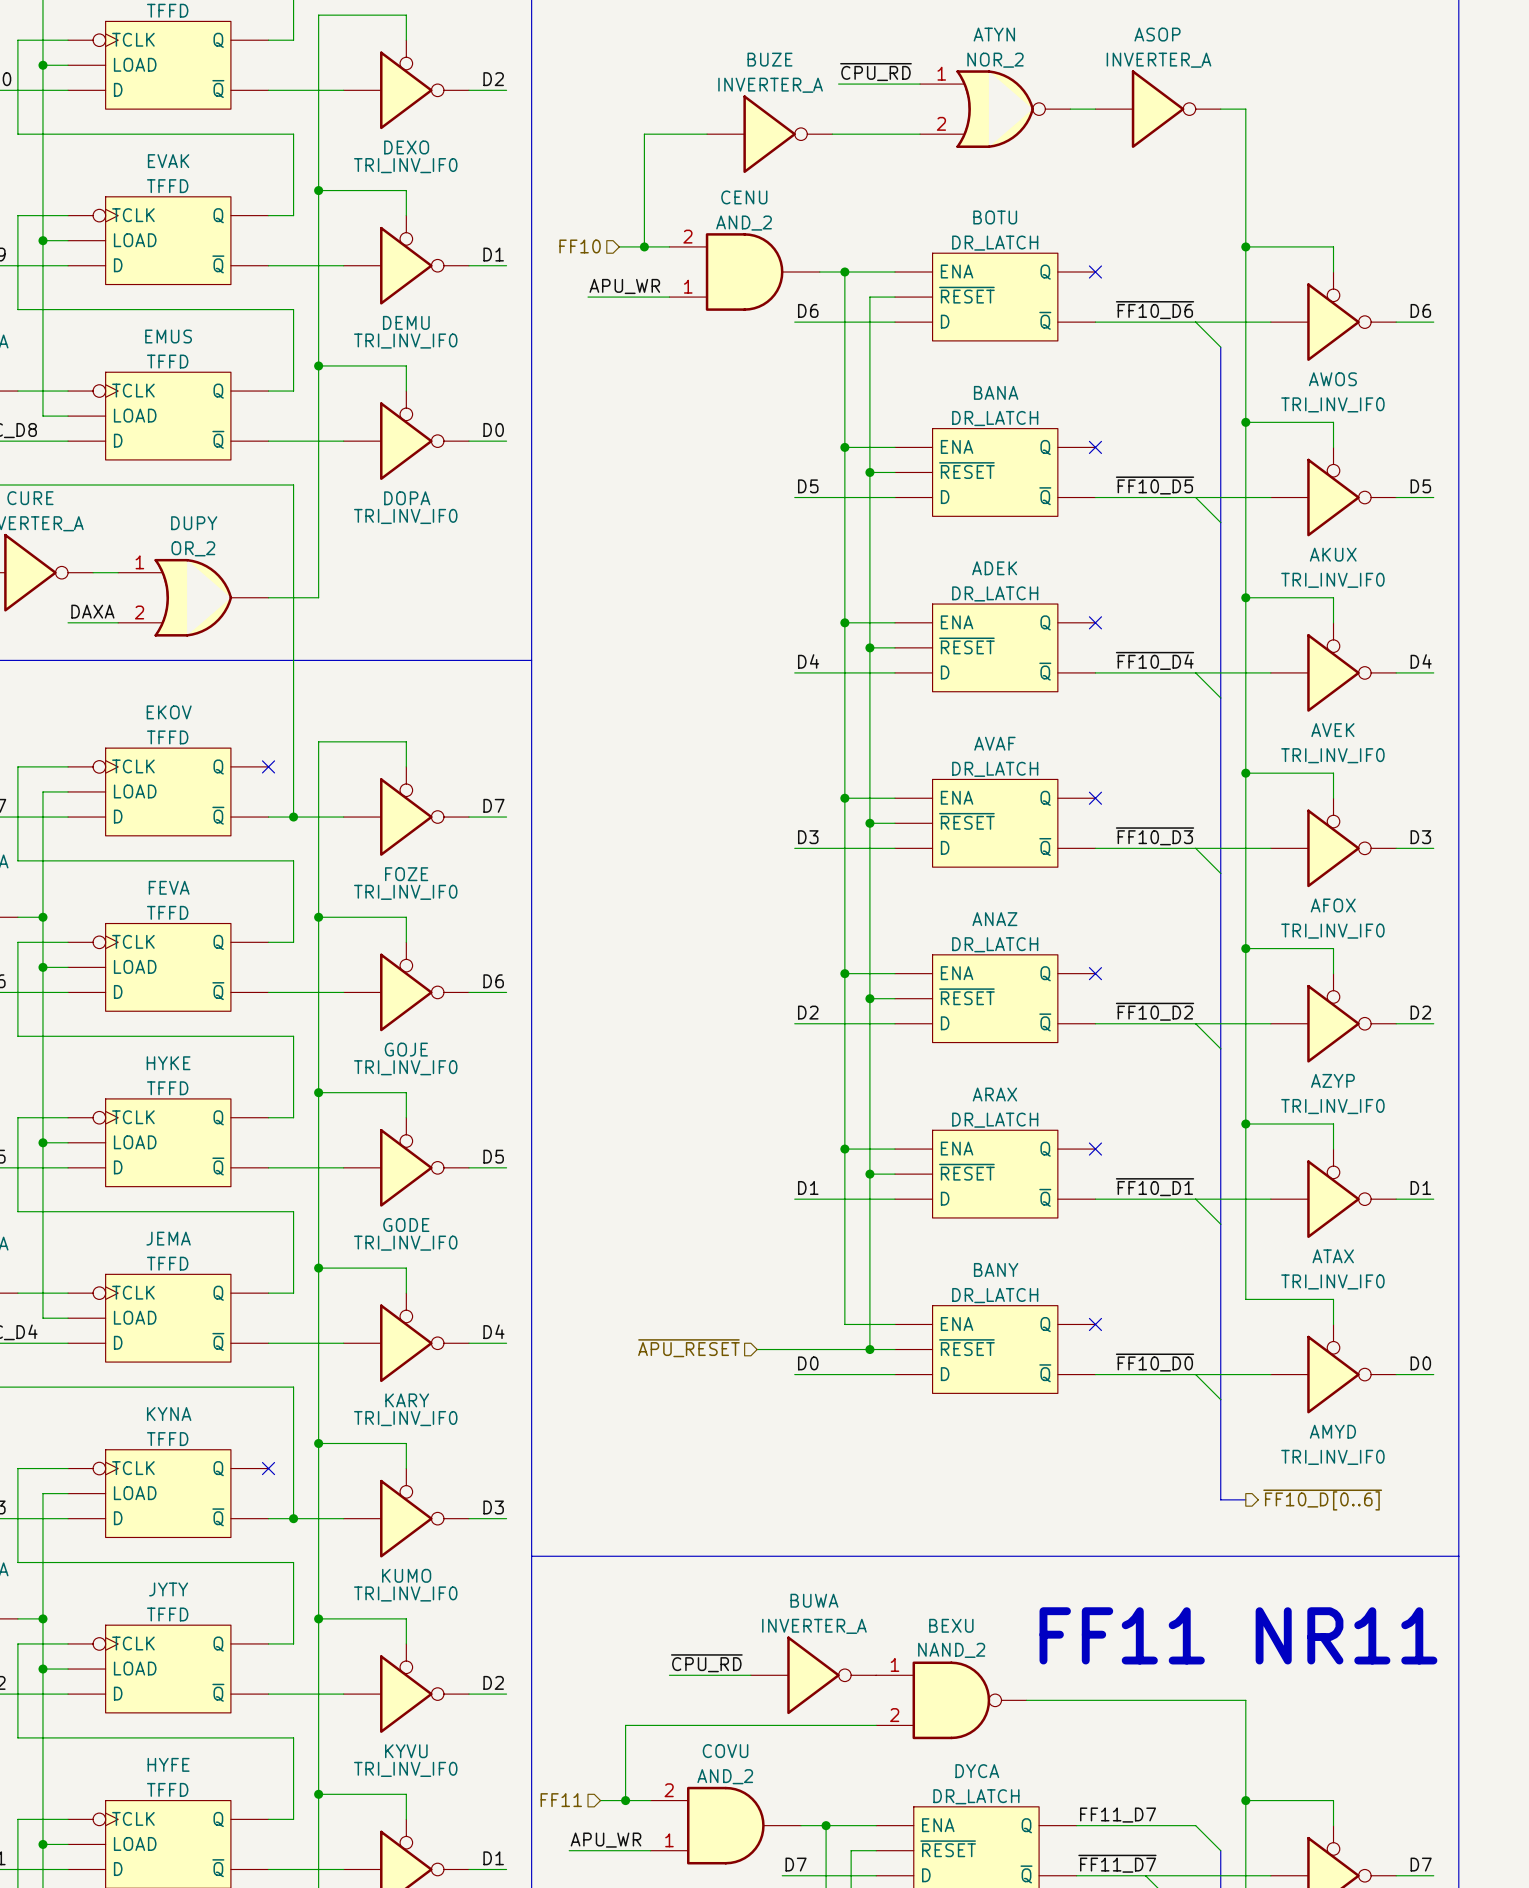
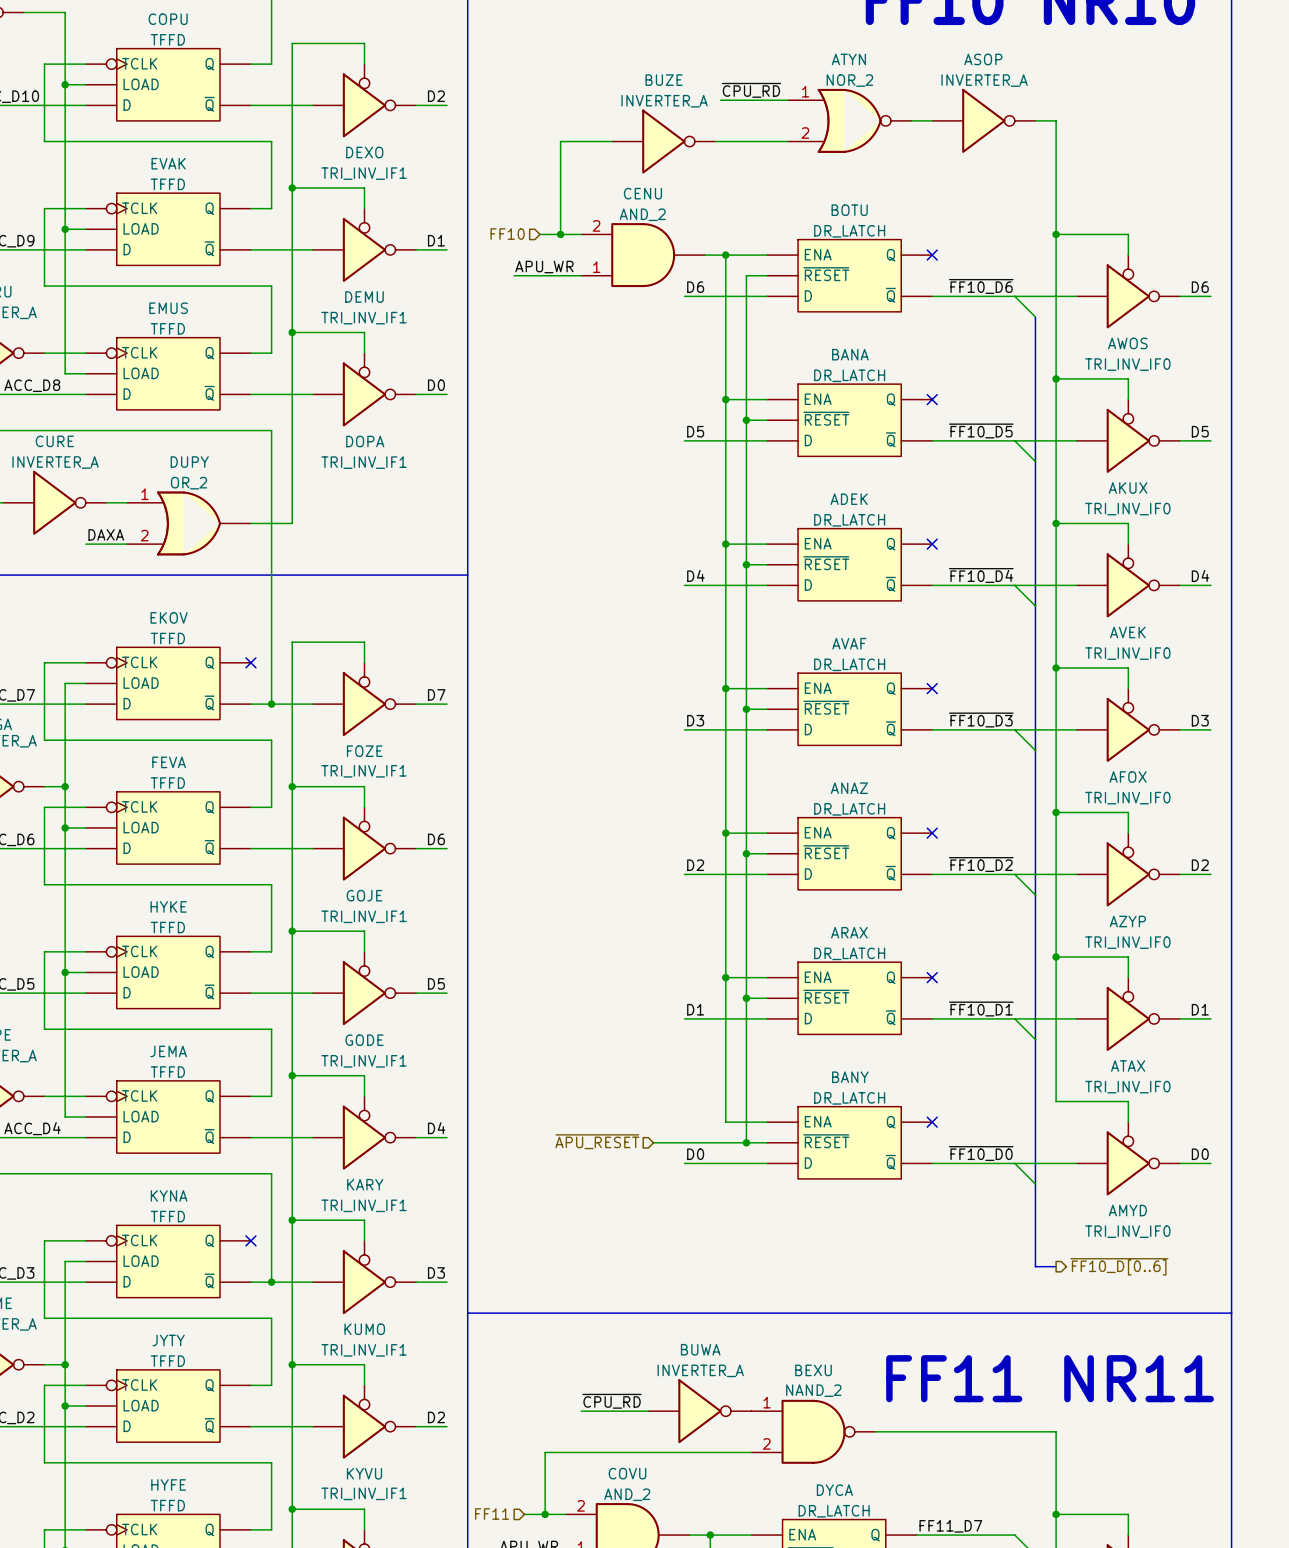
DEXO value: TRI_INV_IF0 (405, 165) -> TRI_INV_IF1 (364, 173)
DEMU value: TRI_INV_IF0 (405, 341) -> TRI_INV_IF1 (364, 318)
DOPA value: TRI_INV_IF0 (405, 516) -> TRI_INV_IF1 (364, 462)
FOZE value: TRI_INV_IF0 (405, 892) -> TRI_INV_IF1 (364, 771)
GOJE value: TRI_INV_IF0 (405, 1067) -> TRI_INV_IF1 (364, 916)
GODE value: TRI_INV_IF0 (405, 1243) -> TRI_INV_IF1 (364, 1061)
KARY value: TRI_INV_IF0 (405, 1418) -> TRI_INV_IF1 (364, 1205)
KUMO value: TRI_INV_IF0 (405, 1593) -> TRI_INV_IF1 (364, 1350)
KYVU value: TRI_INV_IF0 (405, 1769) -> TRI_INV_IF1 (364, 1493)

